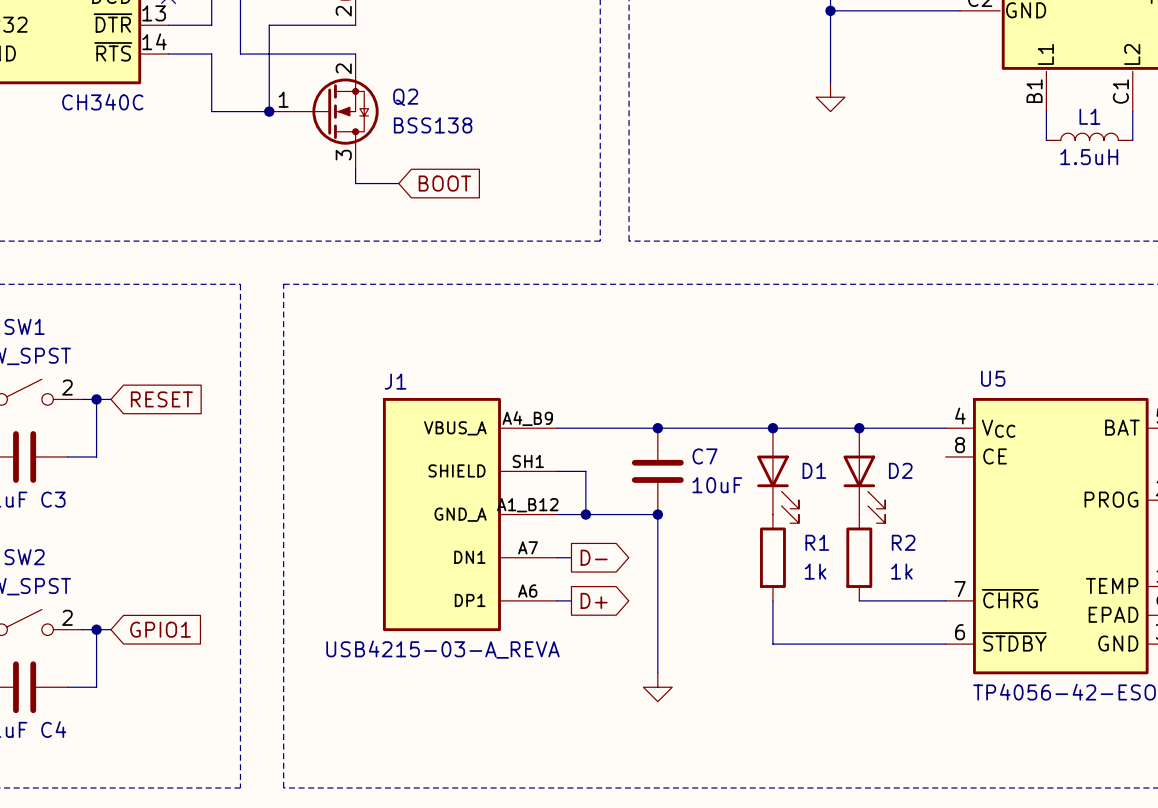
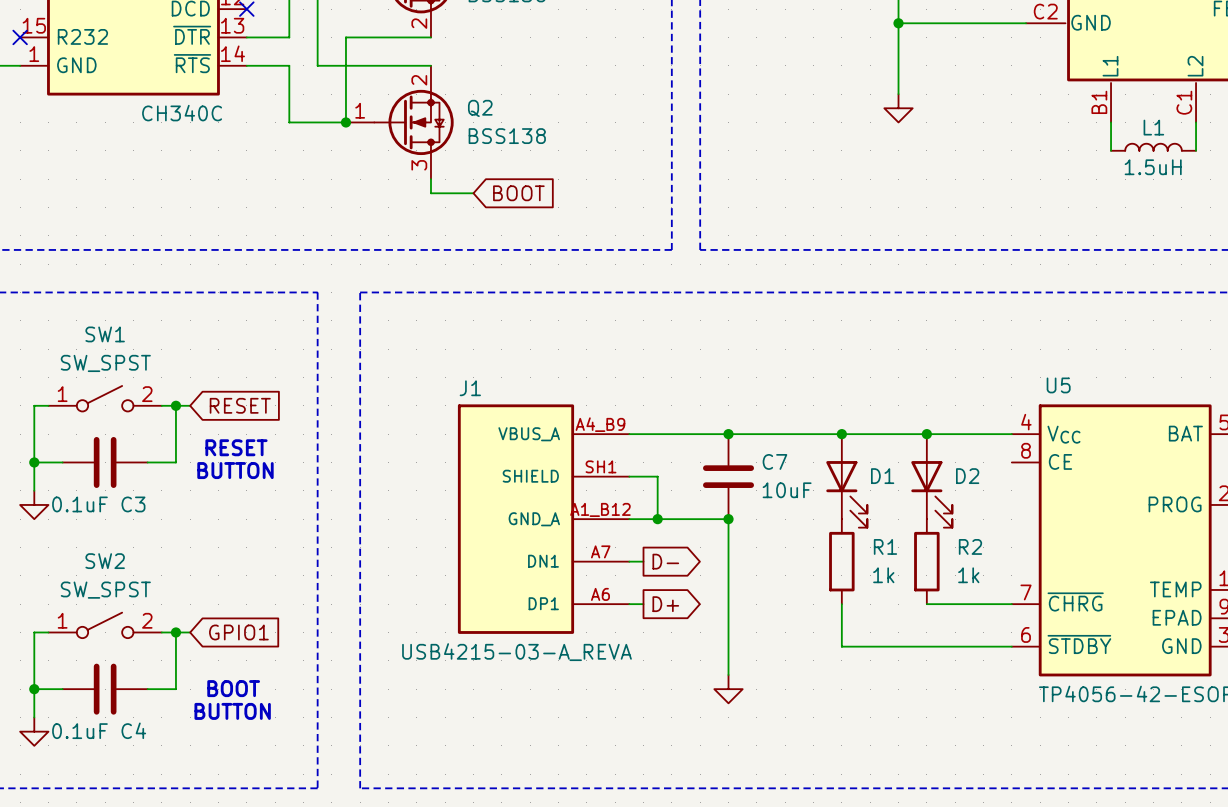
text: none -> RESET (236, 447)
text: none -> BUTTON (235, 470)
text: none -> BOOT (233, 688)
text: none -> BUTTON (232, 711)

